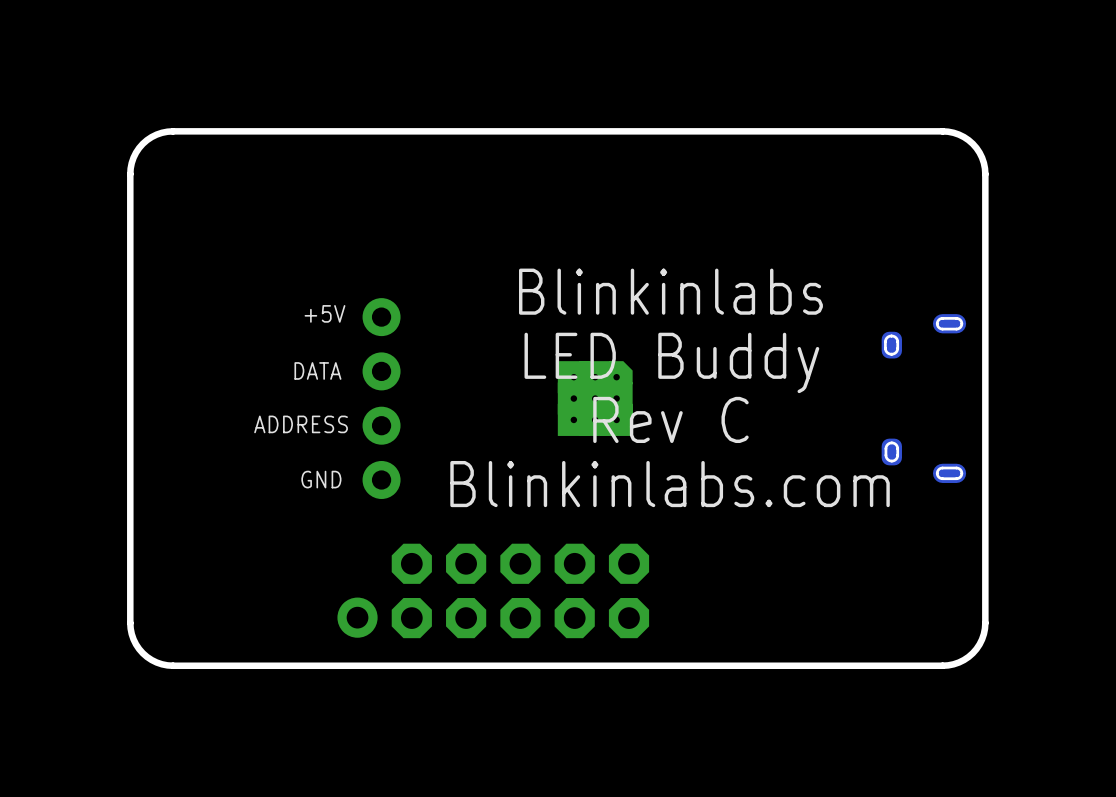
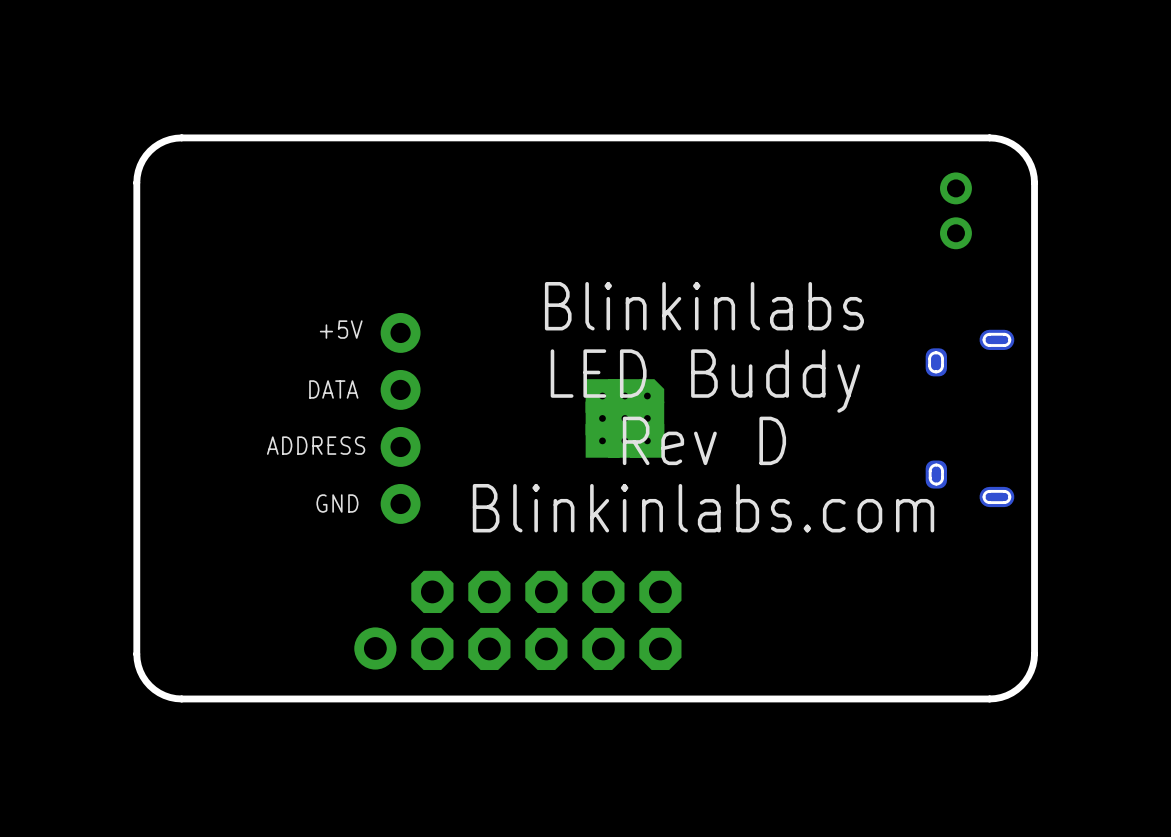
part: none -> (955, 210)
text: Rev C (670, 419) -> Rev D (704, 440)

